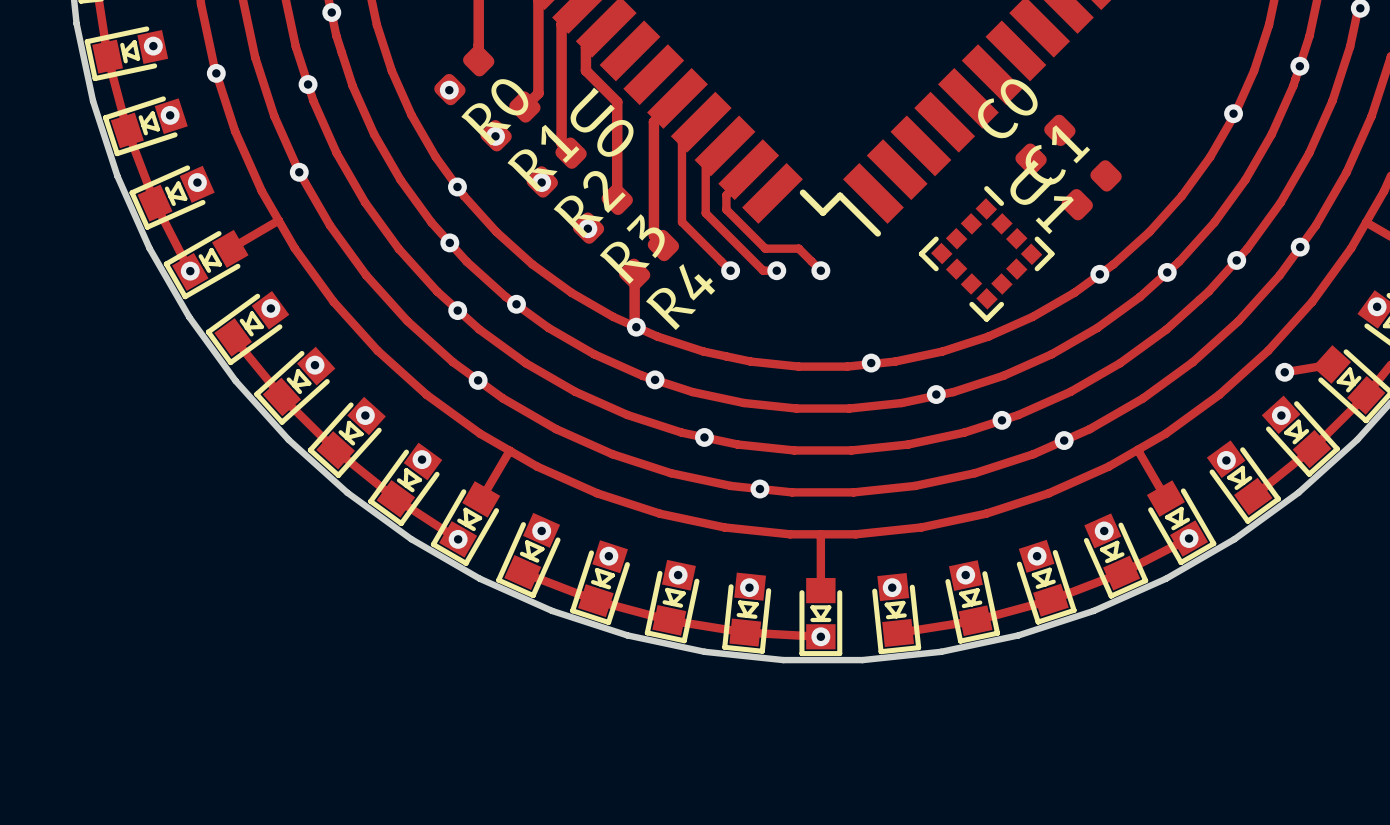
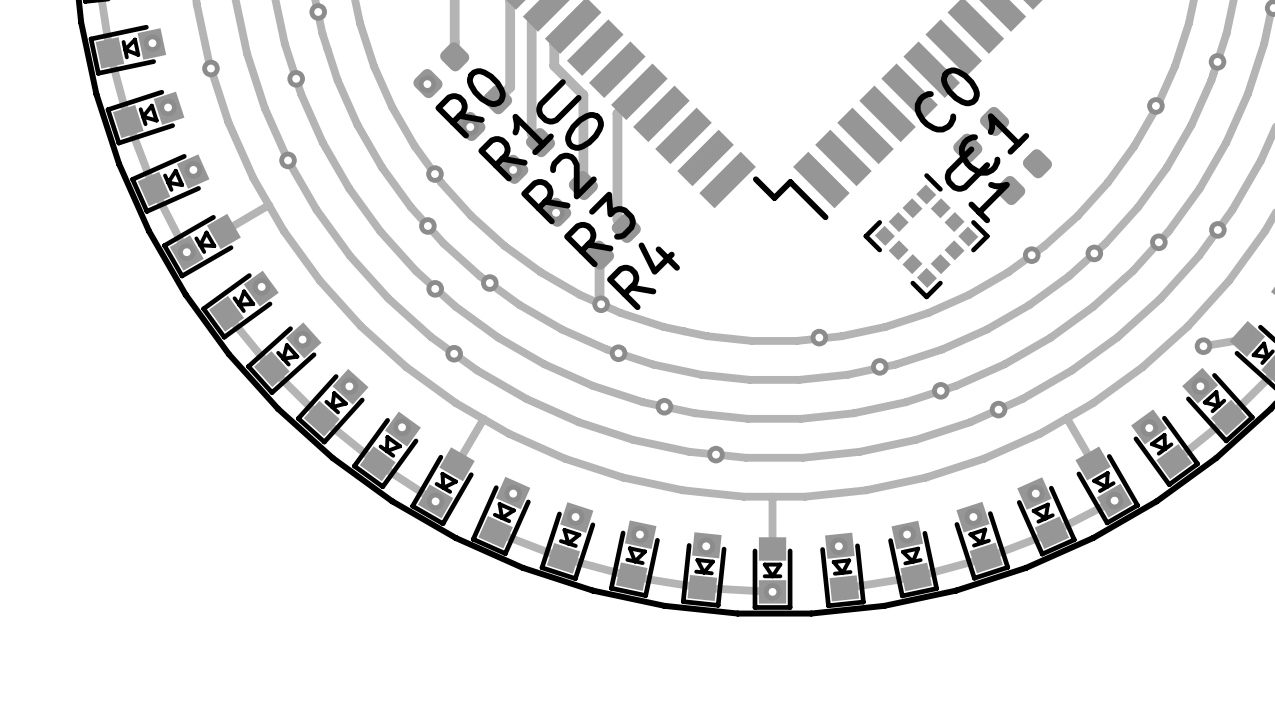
track: (701, 122) (681, 143) (681, 222) (730, 270) -> none
track: (725, 145) (705, 165) (705, 213) (763, 270) (776, 270) -> none
track: (748, 169) (748, 172) (726, 195) (726, 209) (765, 248) (798, 248) (820, 270) -> none
via: (730, 270) -> none
via: (776, 270) -> none
via: (820, 270) -> none

